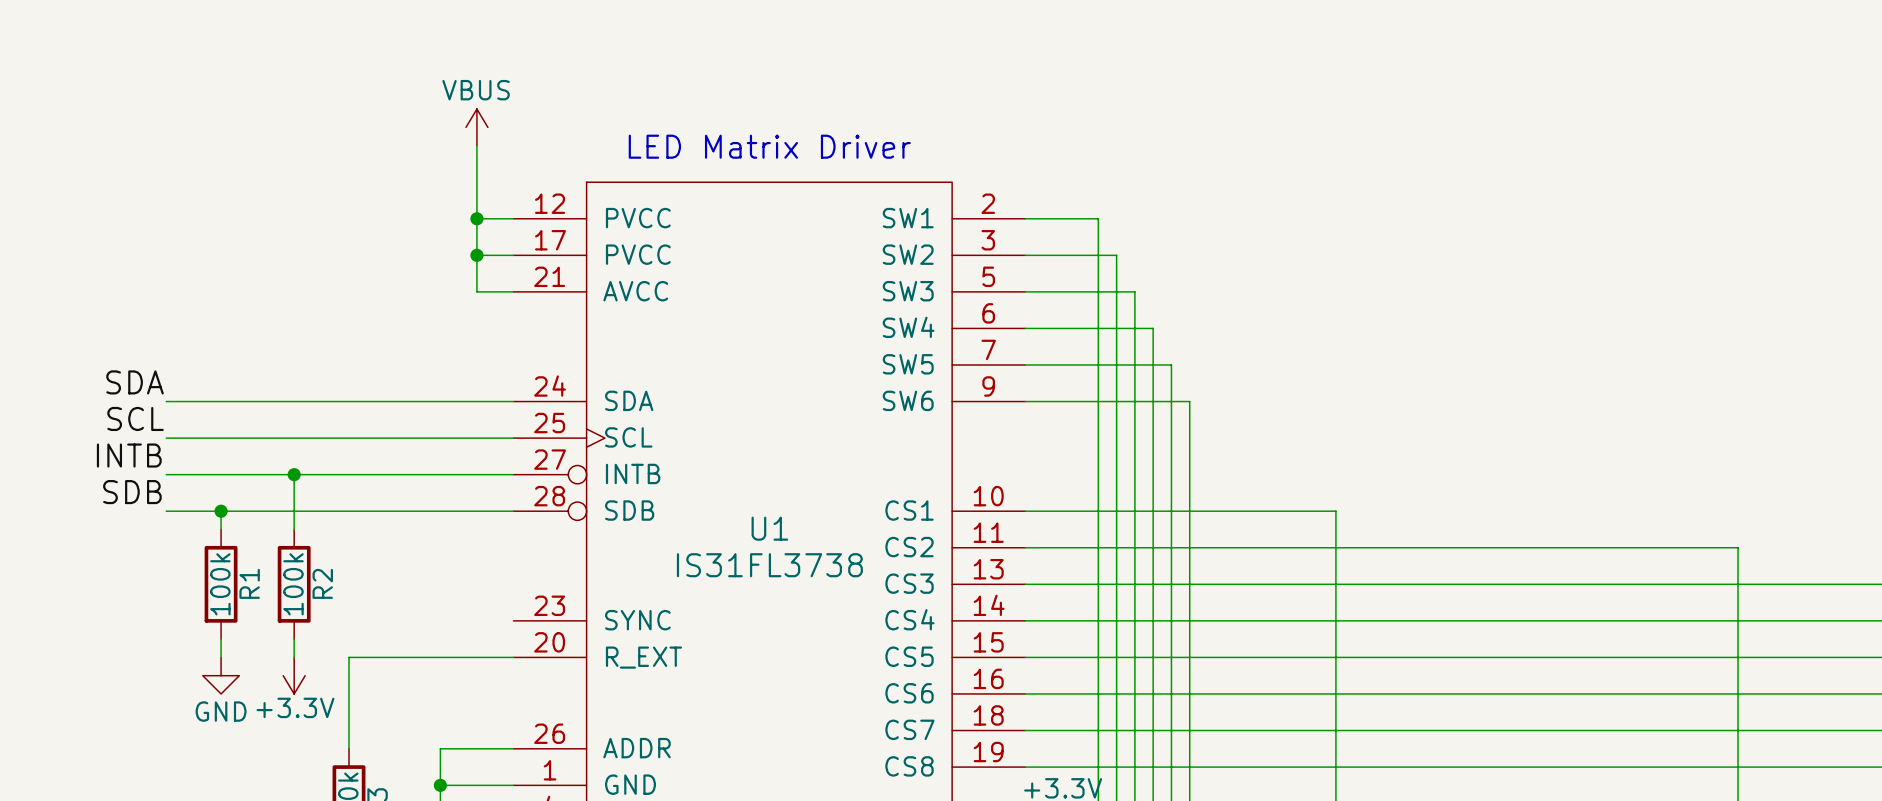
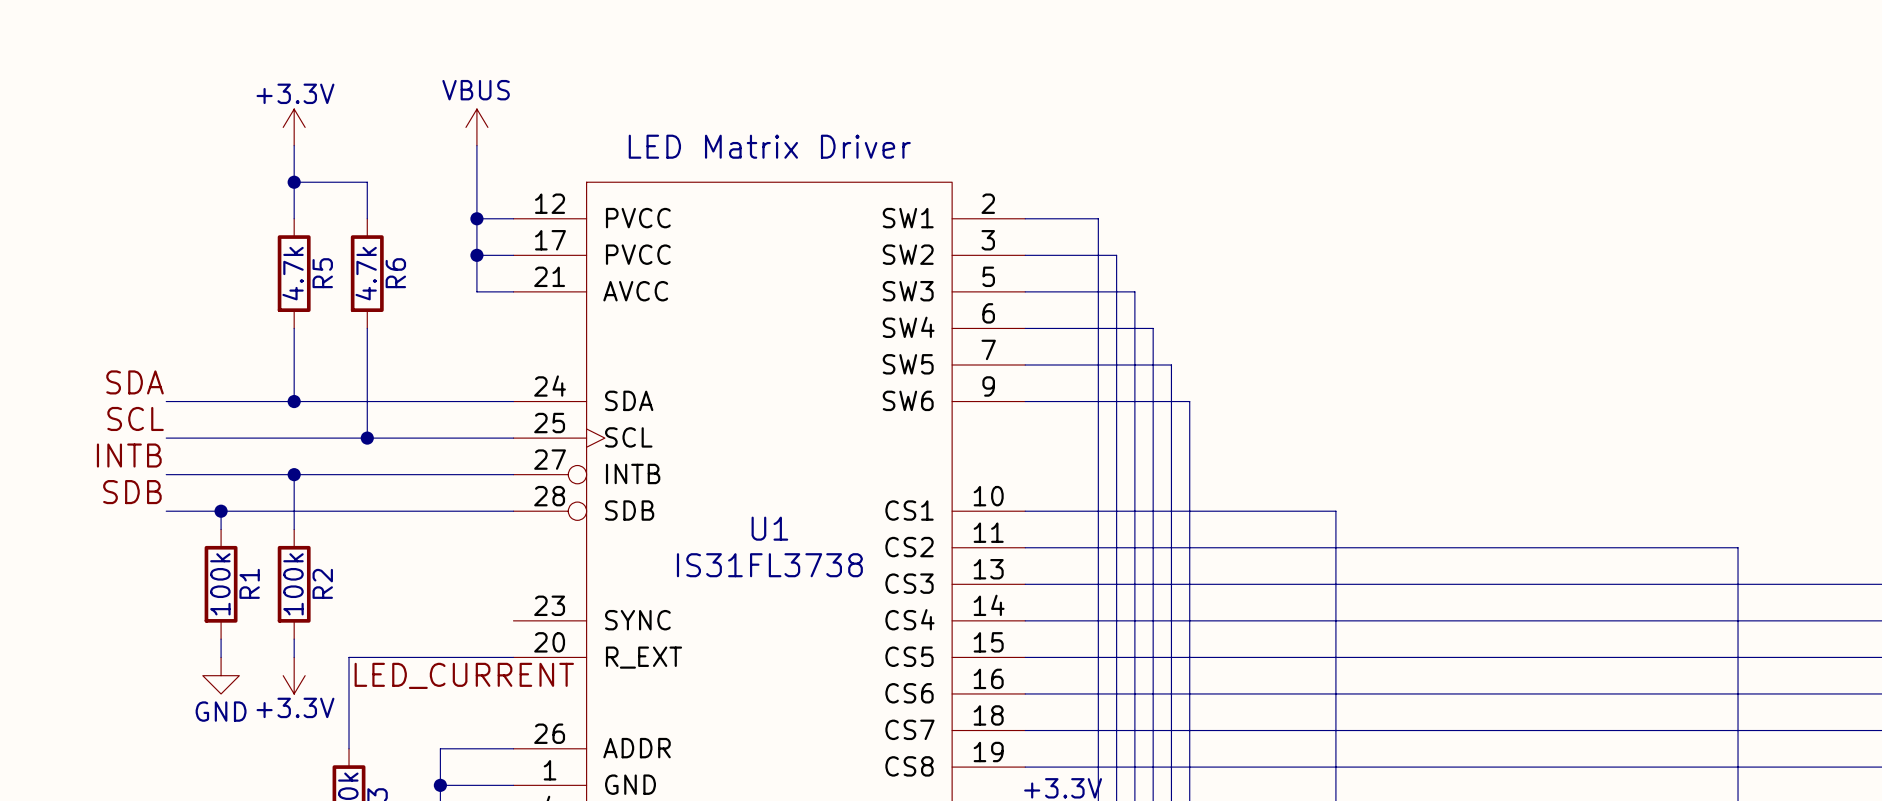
power symbol: none -> +3.3V (294, 127)
wire: none -> (294, 145) (294, 218)
wire: none -> (294, 182) (367, 182) (367, 218)
junction: none -> (294, 182)
R5: none -> 4.7k (294, 273)
R6: none -> 4.7k (367, 273)
wire: none -> (294, 328) (294, 401)
wire: none -> (367, 328) (367, 438)
junction: none -> (294, 401)
junction: none -> (367, 438)
label: none -> LED_CURRENT (464, 675)

